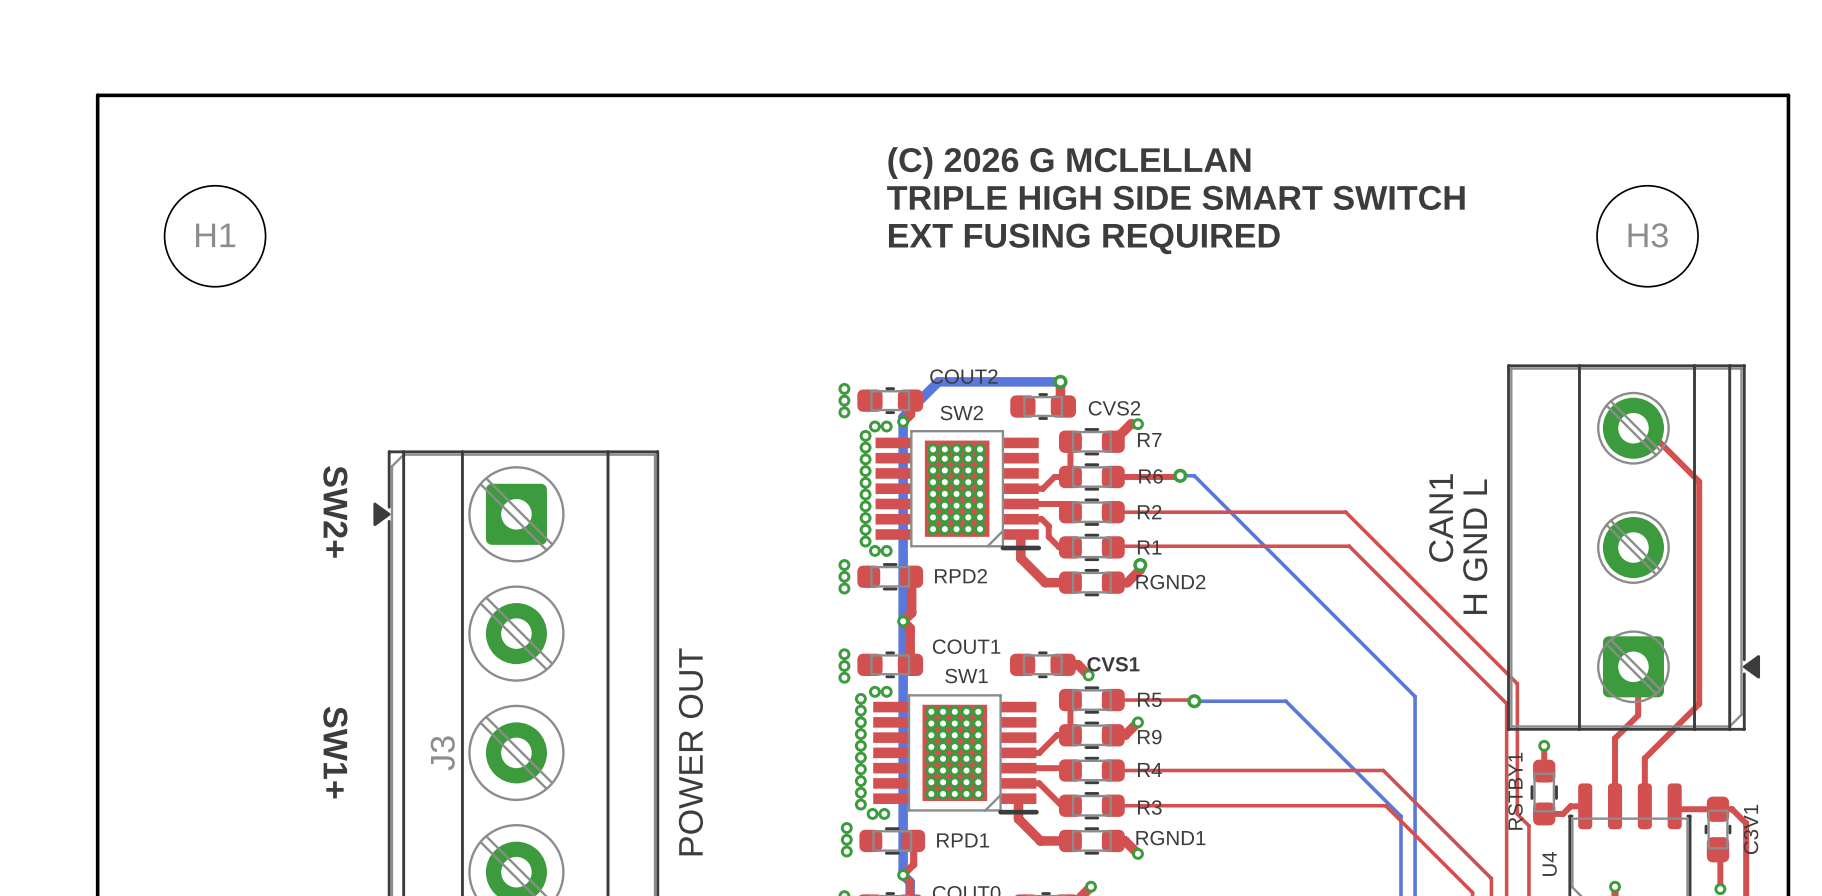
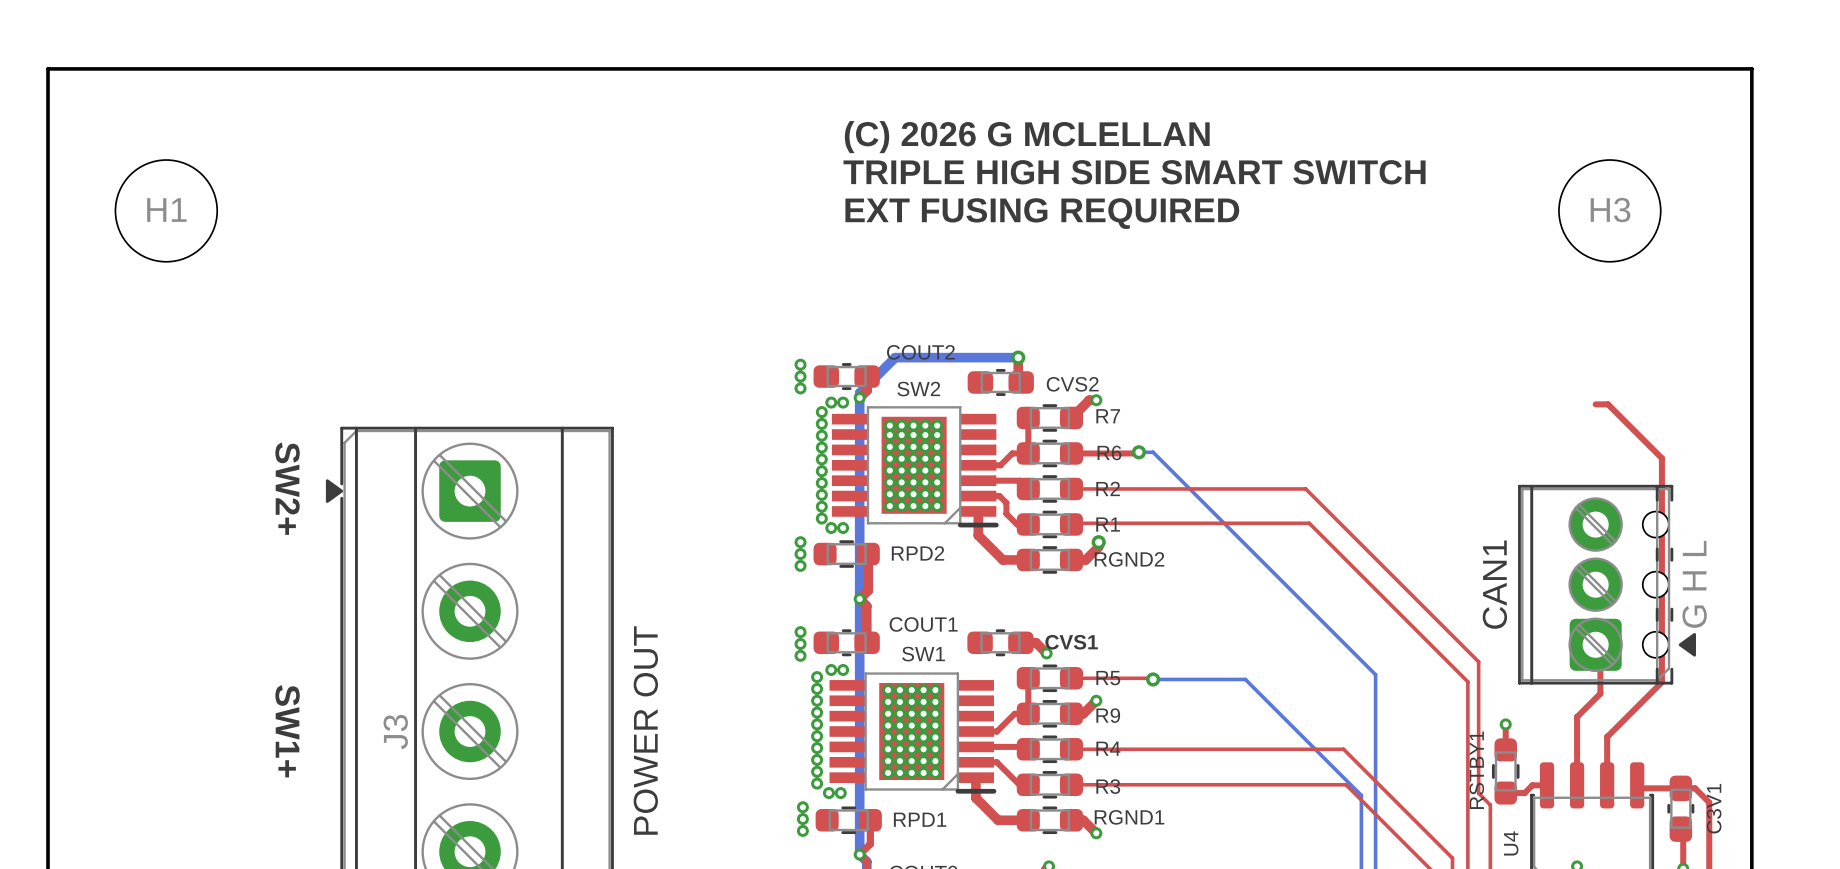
CAN1 footprint: [1507, 364, 1761, 731] -> [1518, 484, 1696, 685]
CAN1 name position: CAN1 (1441, 518) -> CAN1 (1494, 584)
CAN1 value: H GND L (1475, 546) -> G H L (1694, 584)

